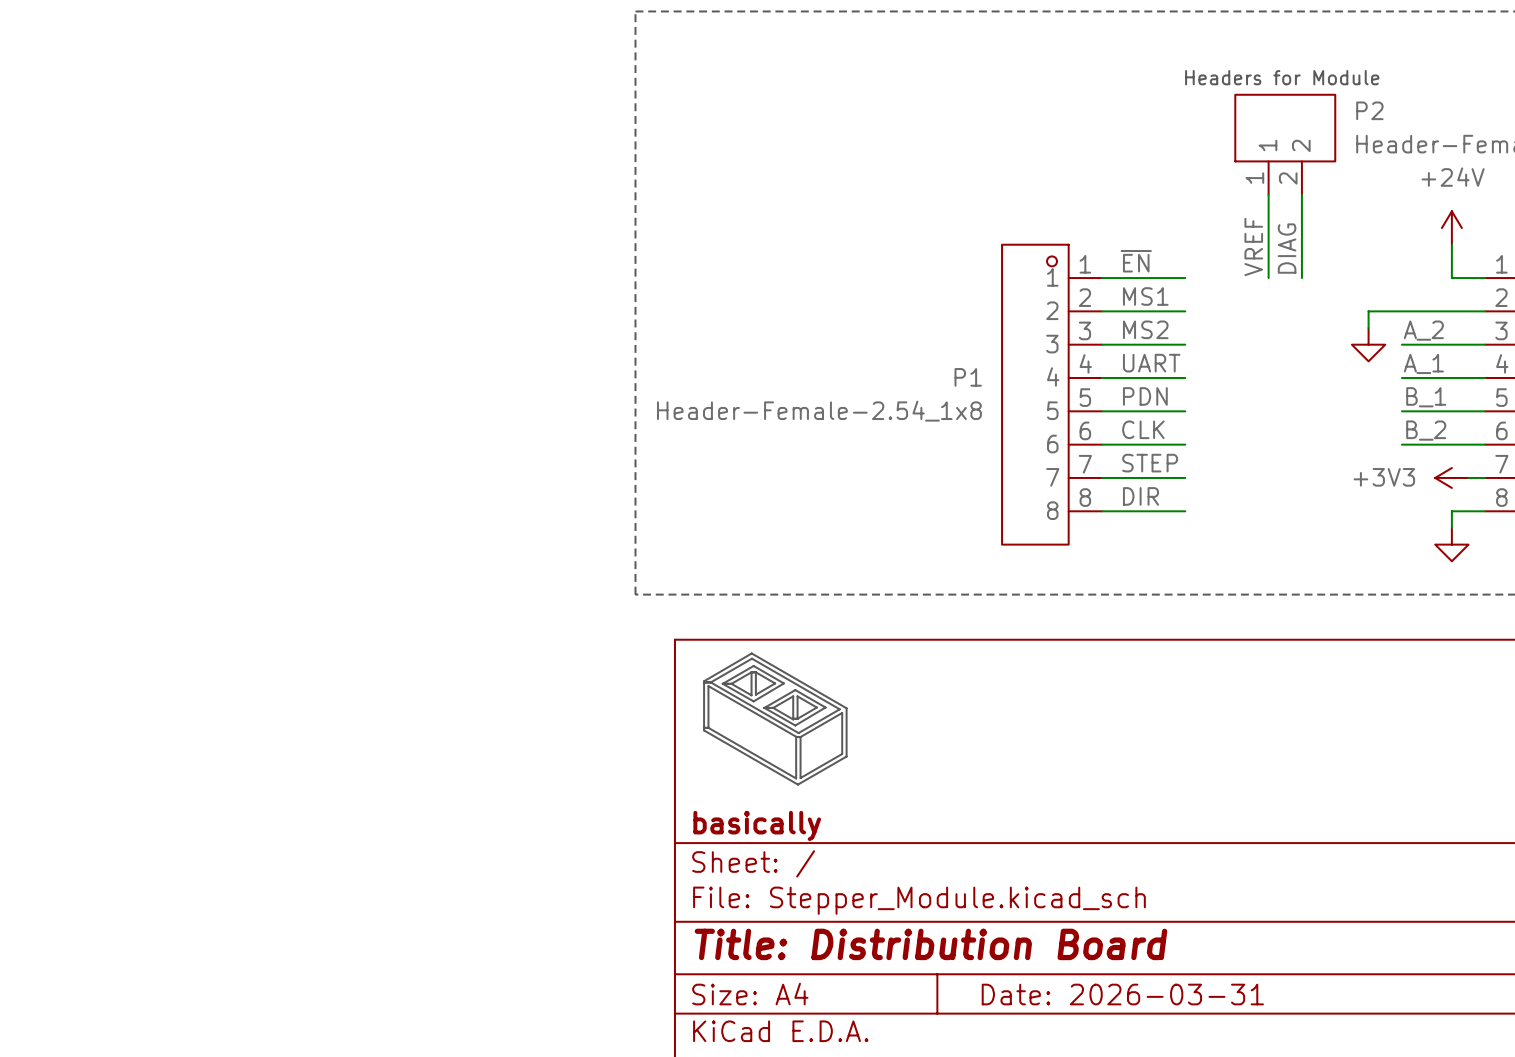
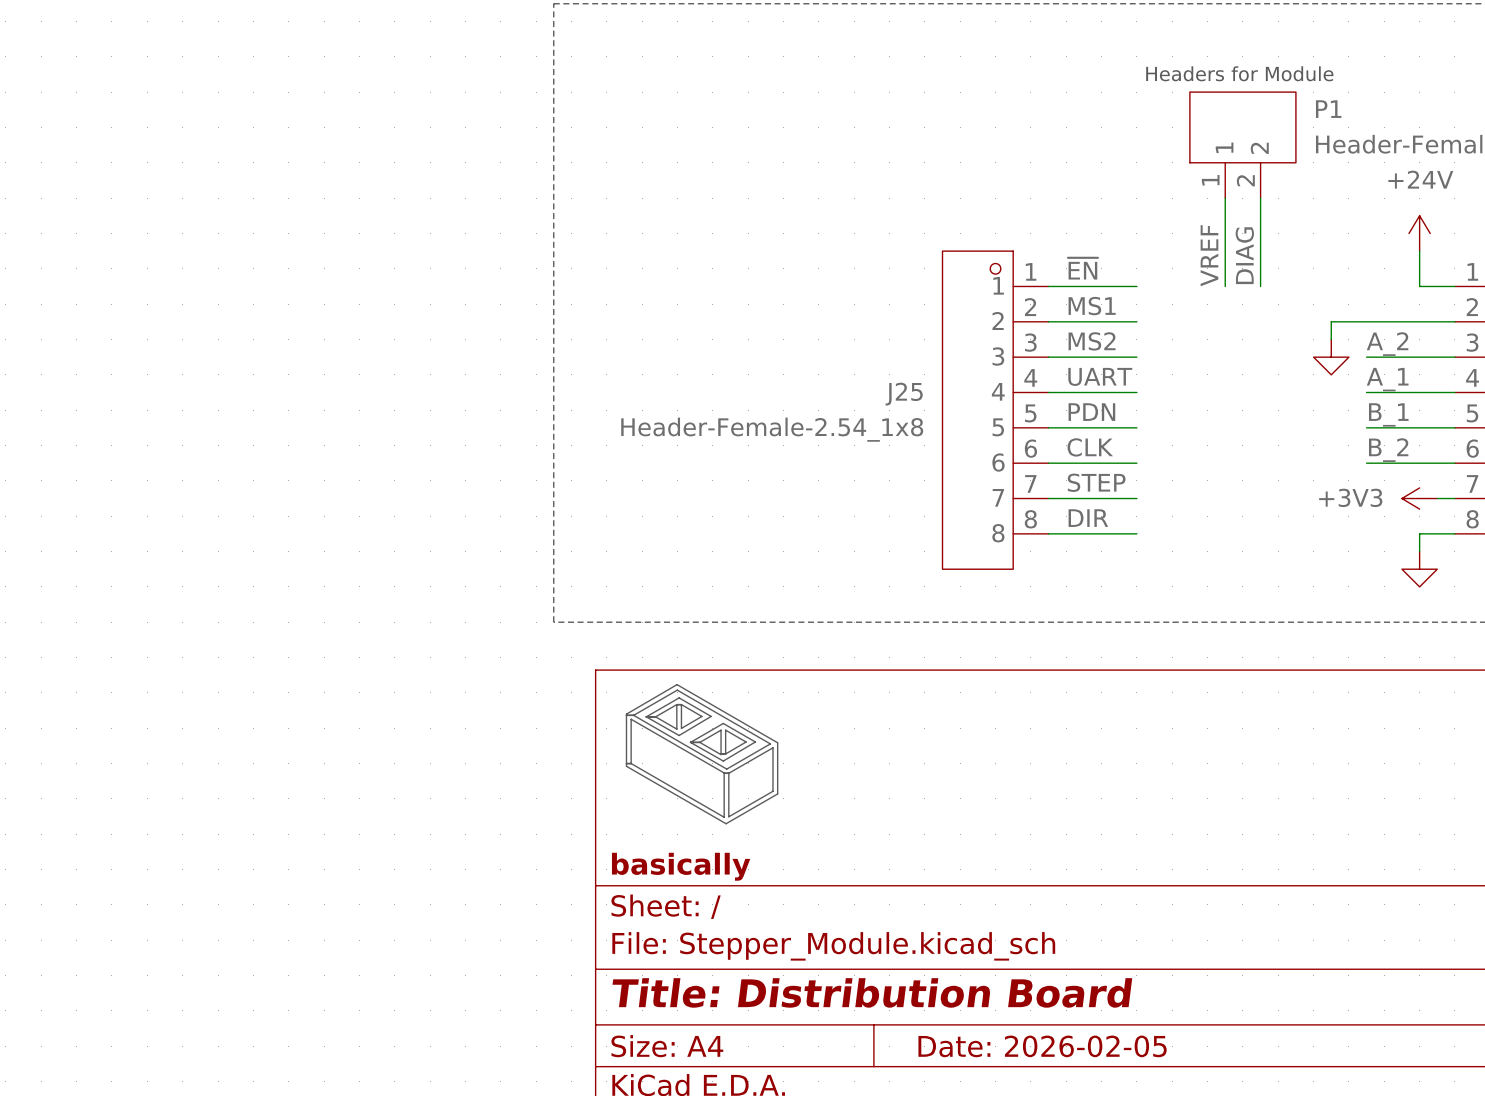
P2 name: P2 (1369, 110) -> P1 (1328, 109)
P1 name: P1 (968, 377) -> J25 (904, 394)
title block: Date: 2026-03-31 (1122, 994) -> Date: 2026-02-05 (1042, 1046)

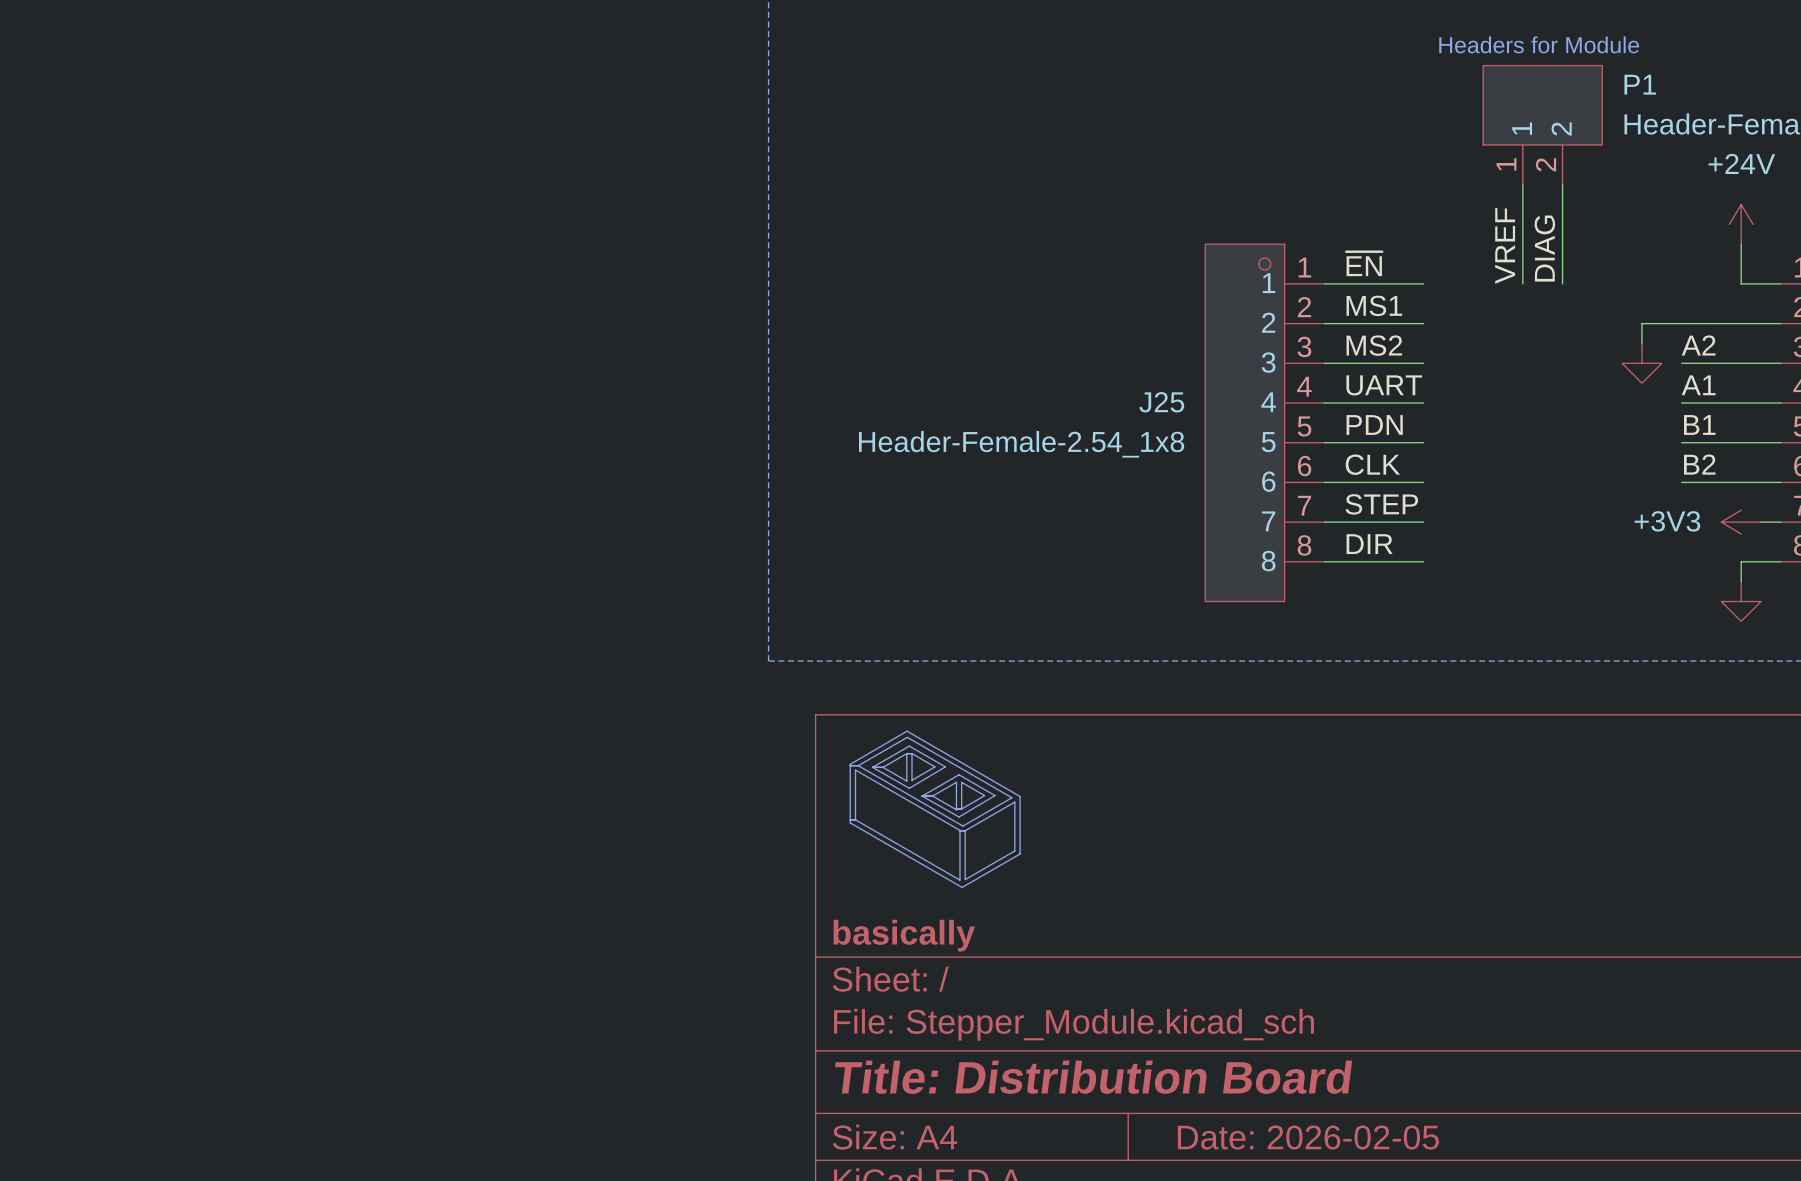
label: A_2 (1387, 344) -> A2 (1698, 345)
label: A_1 (1387, 379) -> A1 (1698, 385)
label: B_1 (1388, 414) -> B1 (1699, 425)
label: B_2 (1388, 450) -> B2 (1699, 464)

